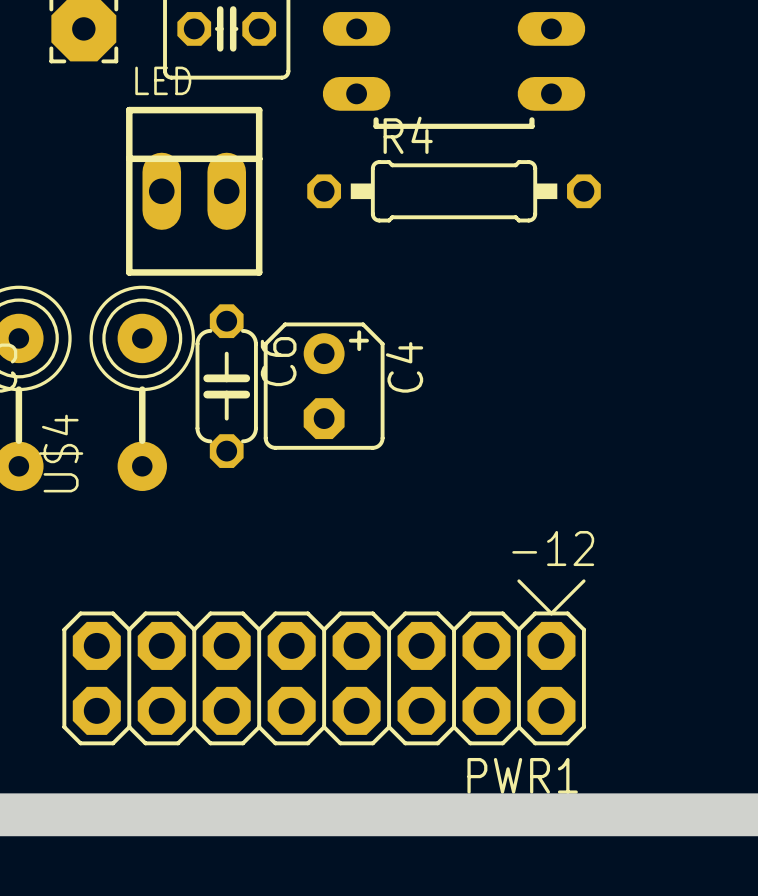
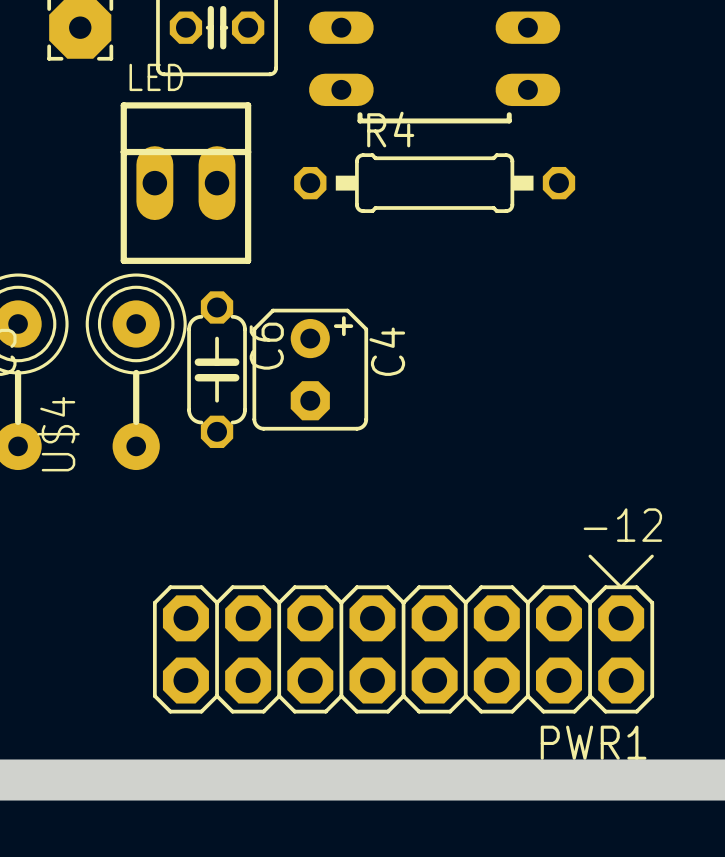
PWR1 position: (324, 662) -> (403, 634)

